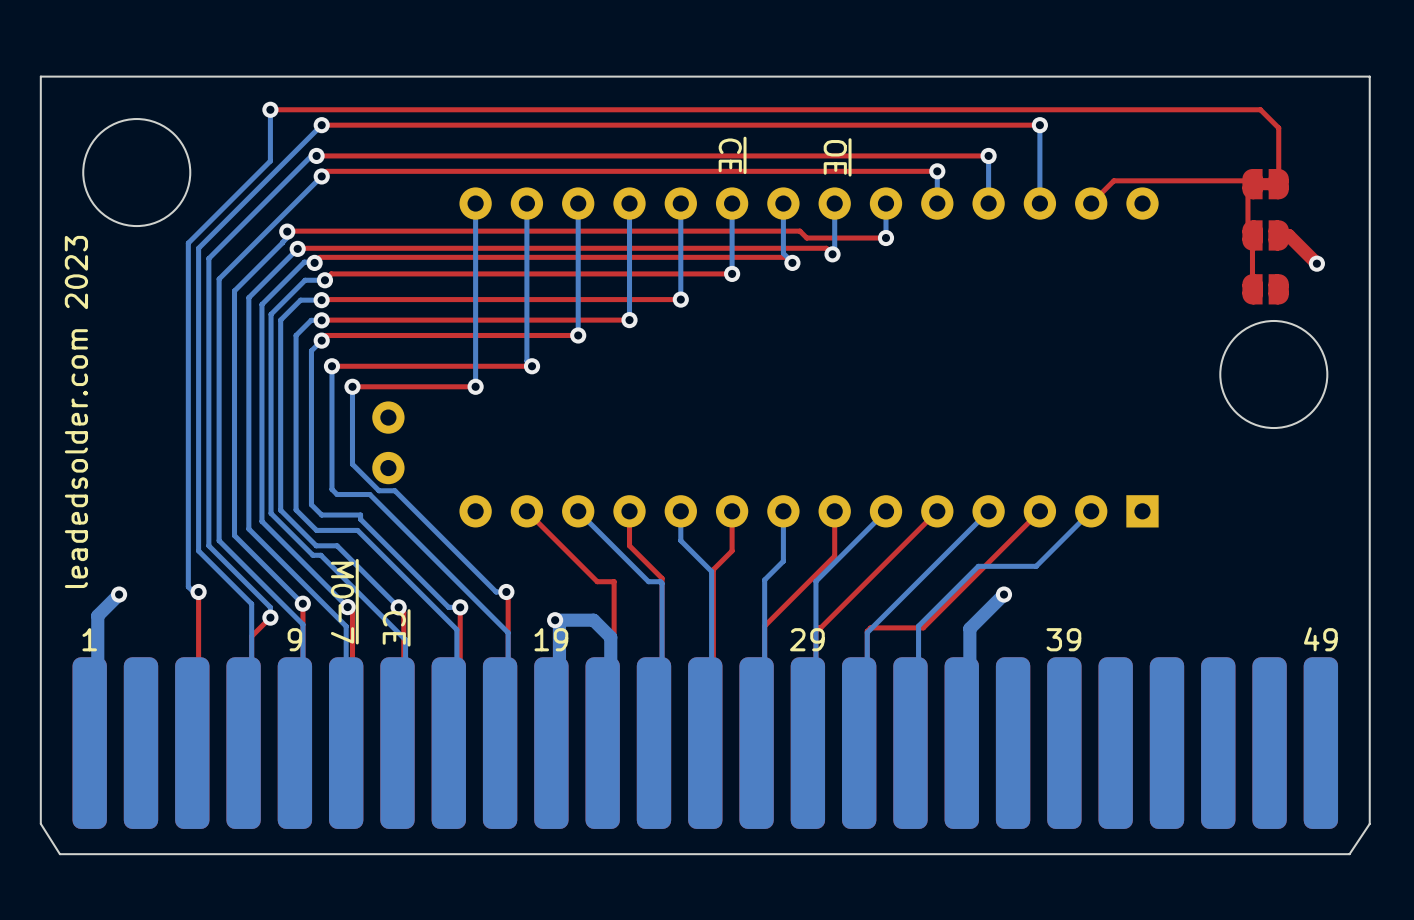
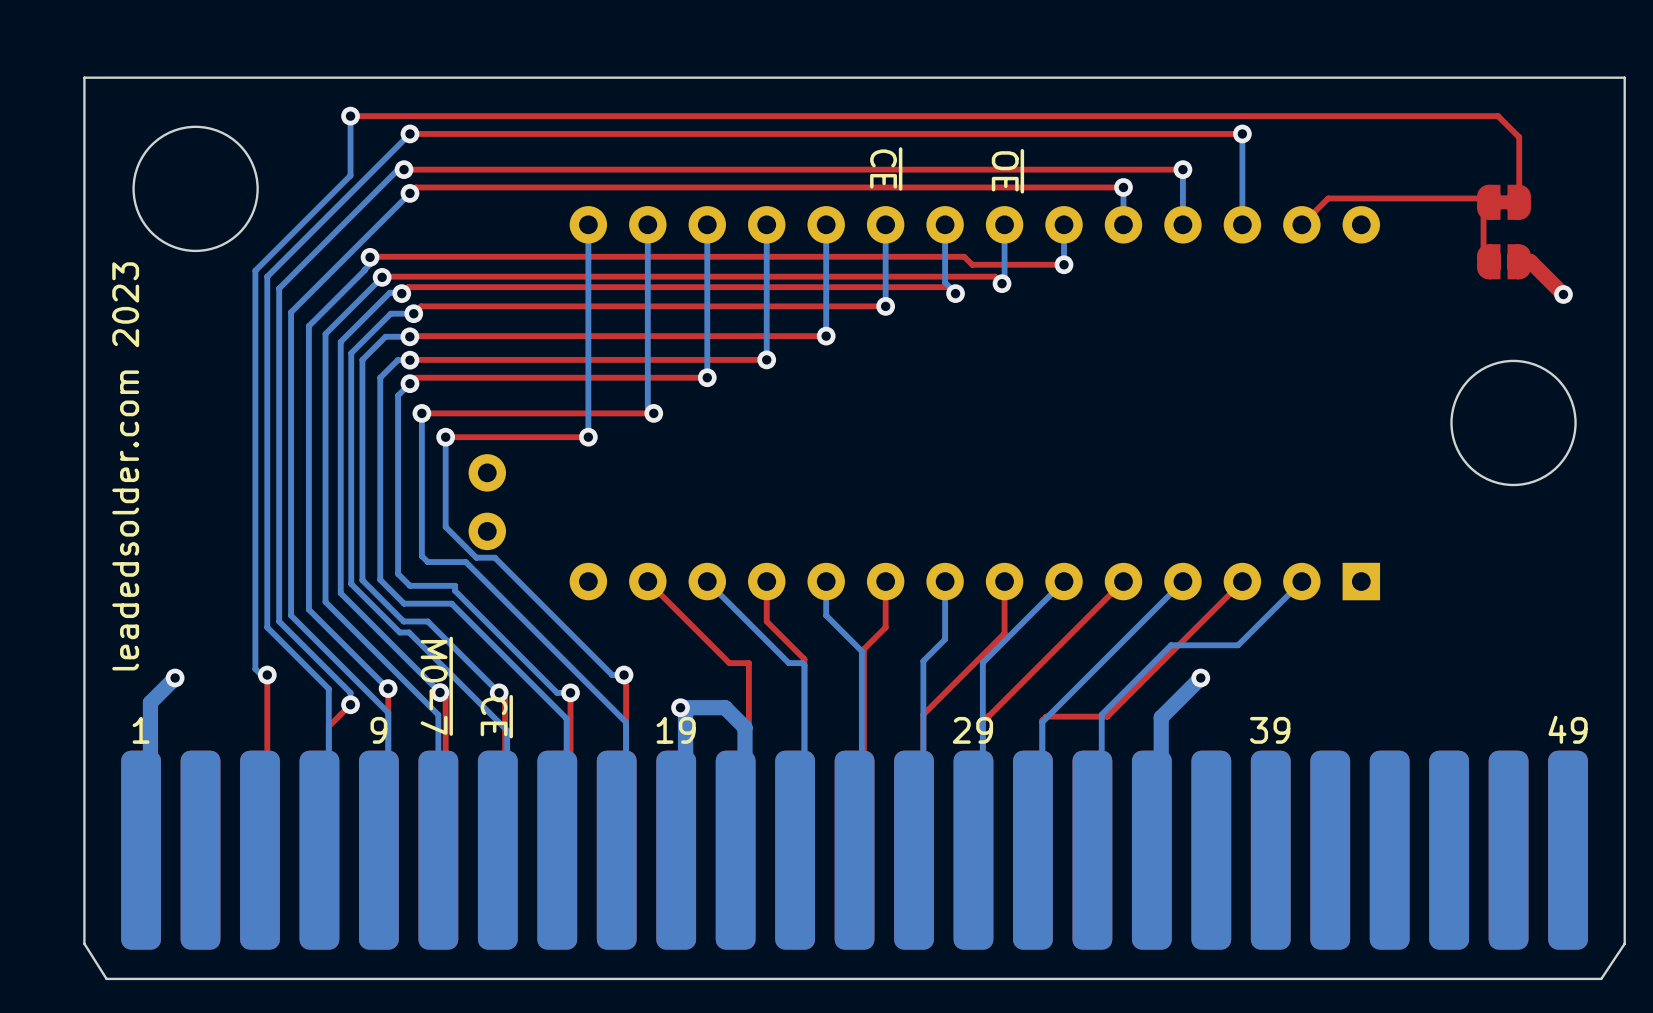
top track: (1252, 235) (1252, 289) -> none
part: (1265, 289) -> none

